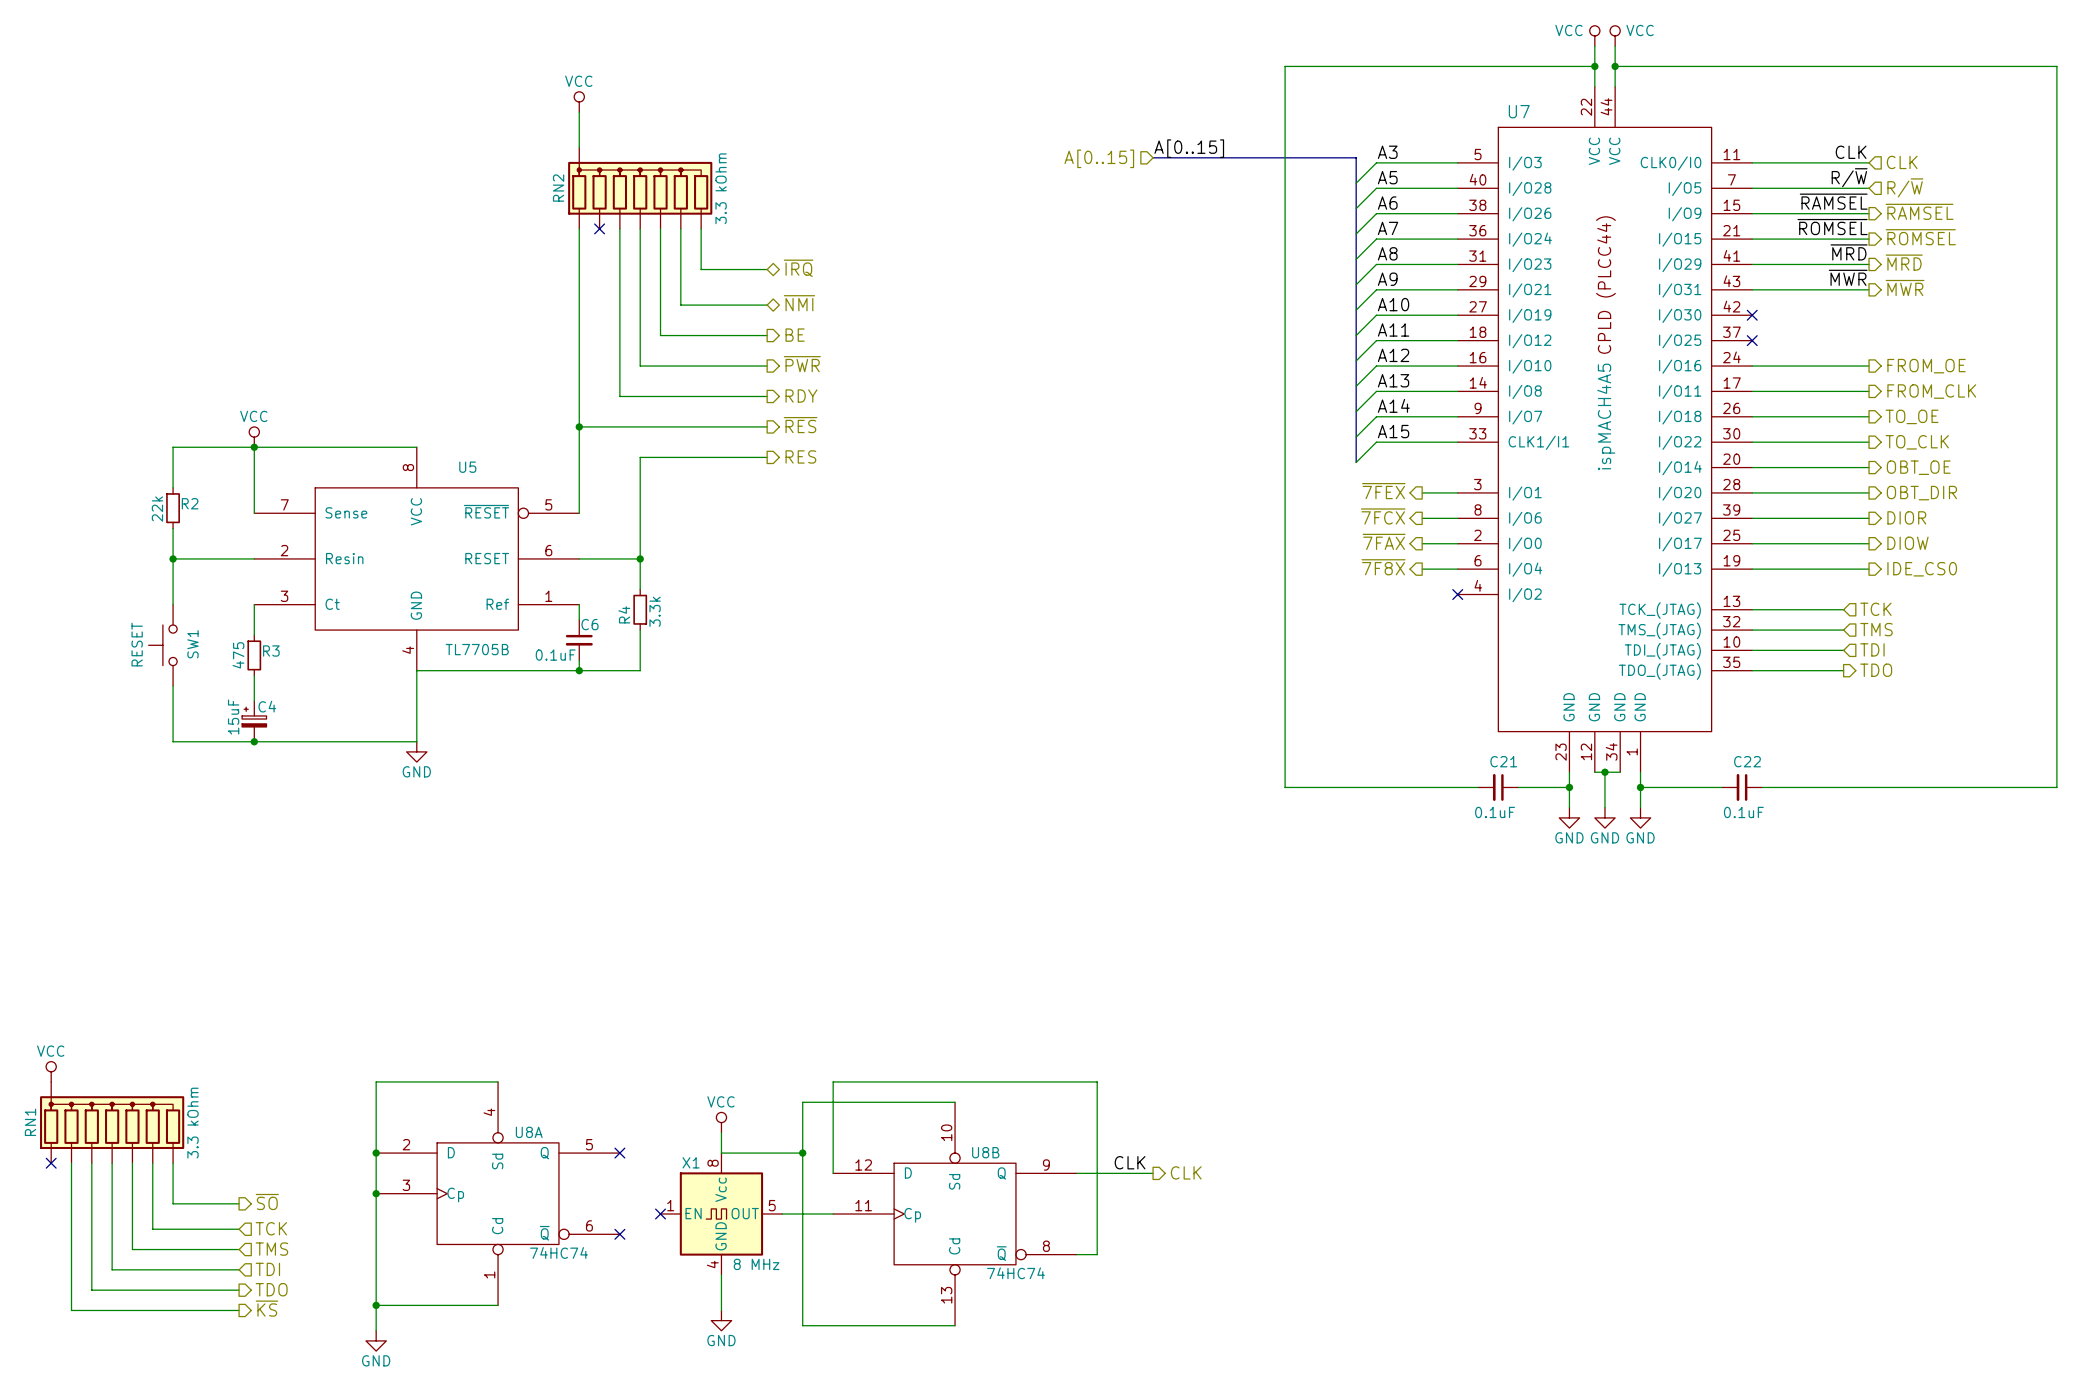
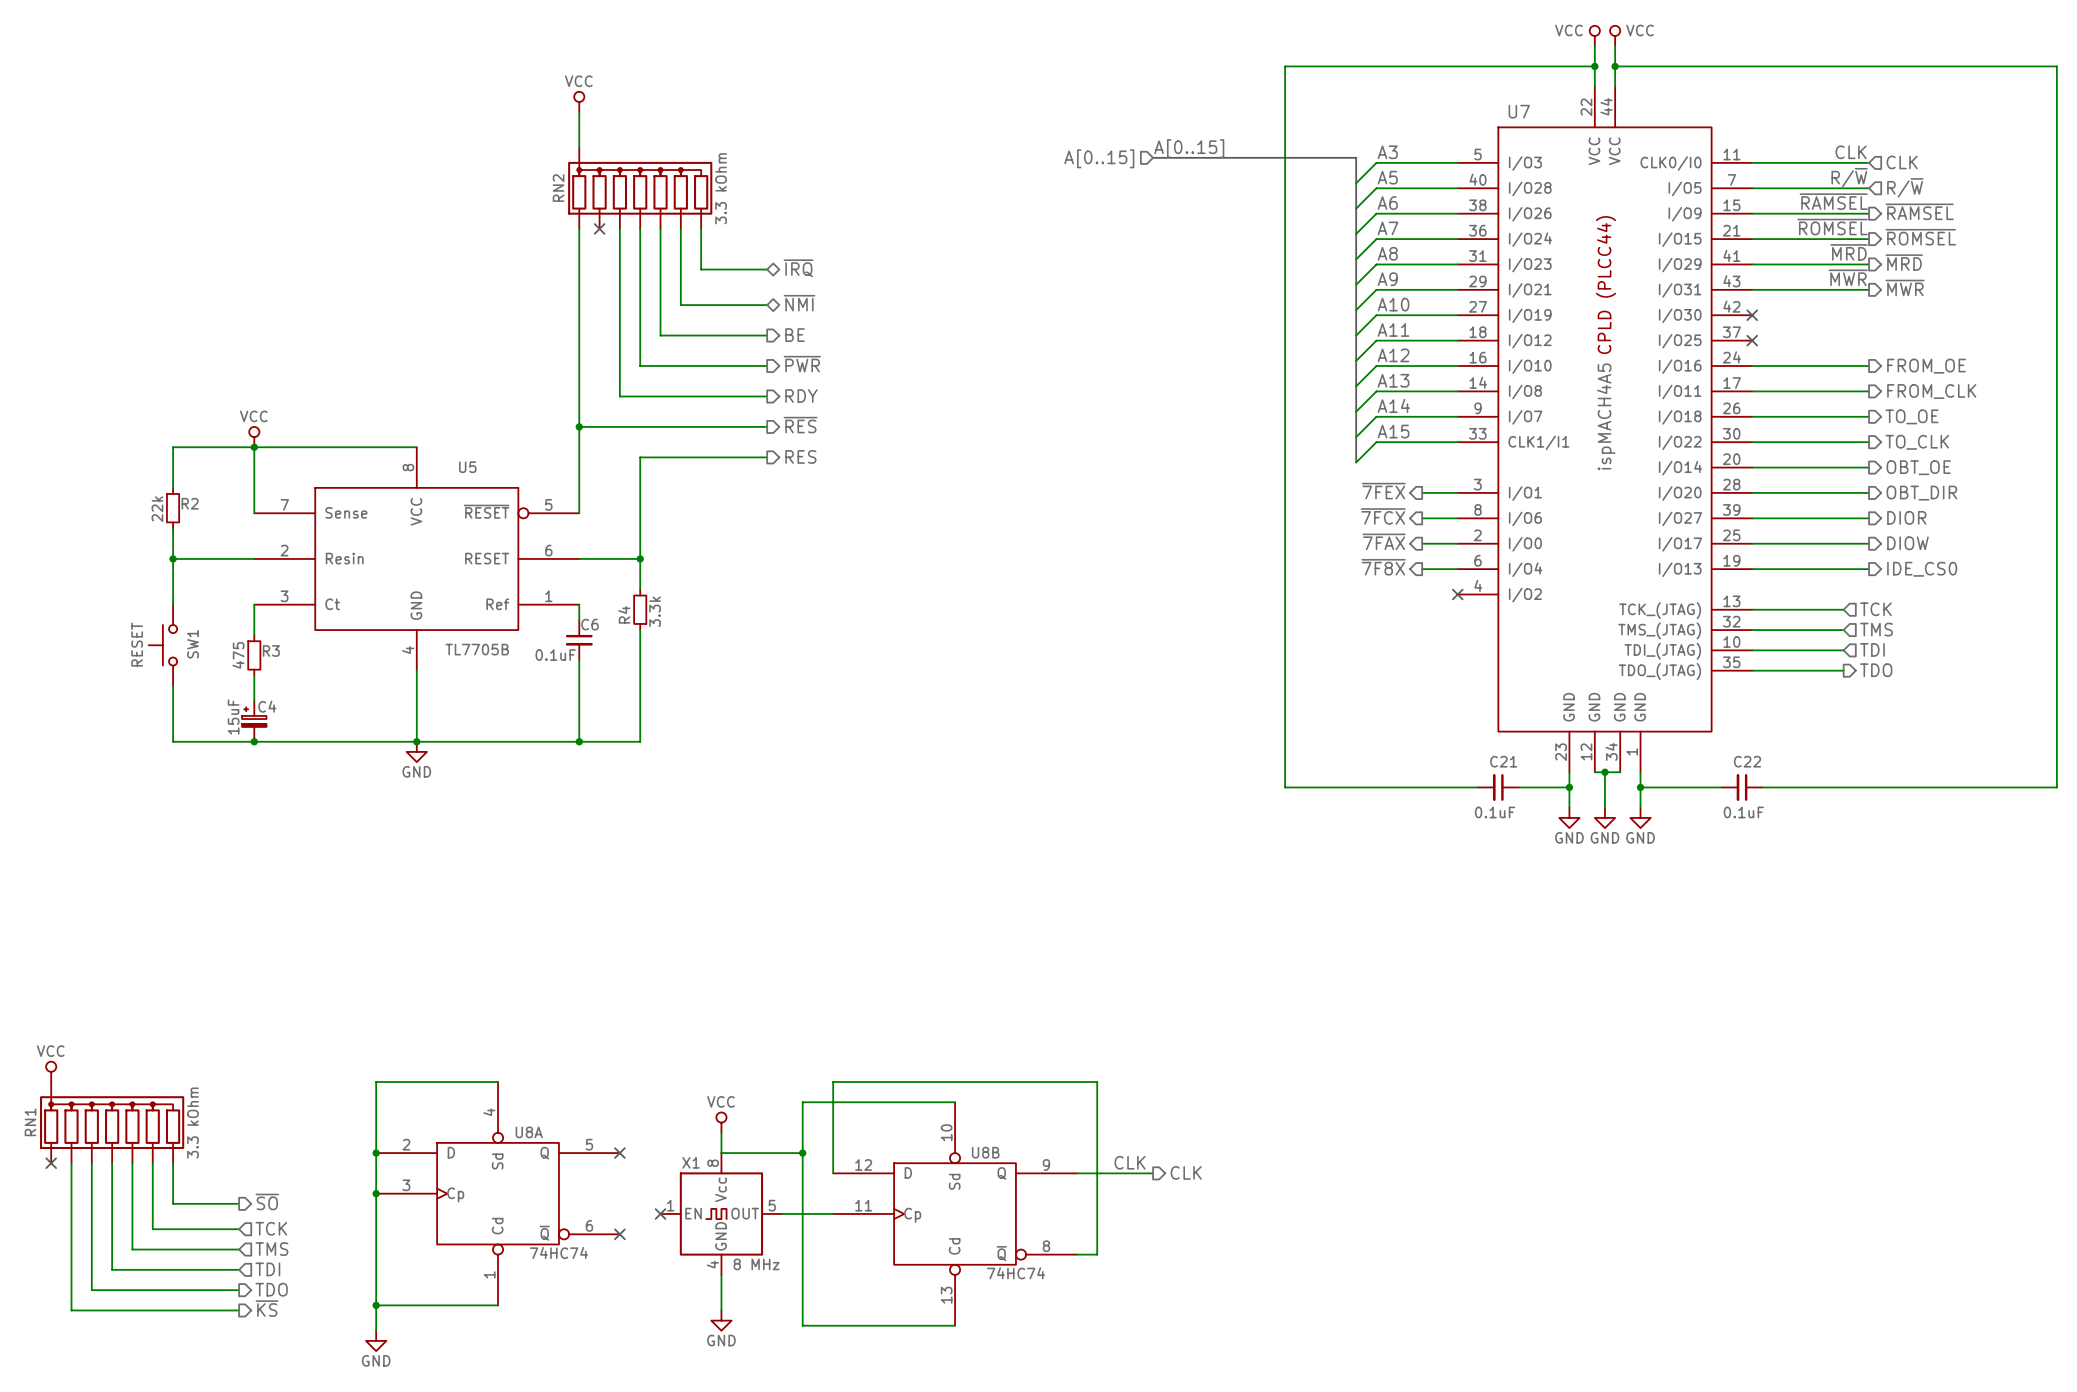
wire: (416, 670) (640, 670) -> (416, 741) (640, 741) (640, 670)
wire: none -> (579, 670) (579, 741)
junction: (579, 670) -> none
junction: none -> (416, 741)
junction: none -> (579, 741)

